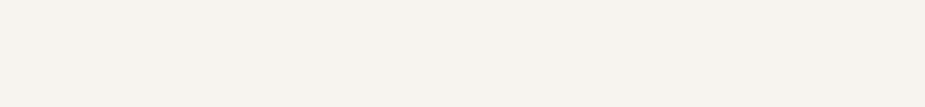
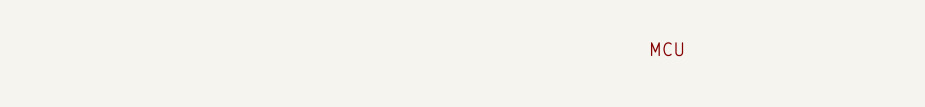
text: none -> MCU (667, 49)

